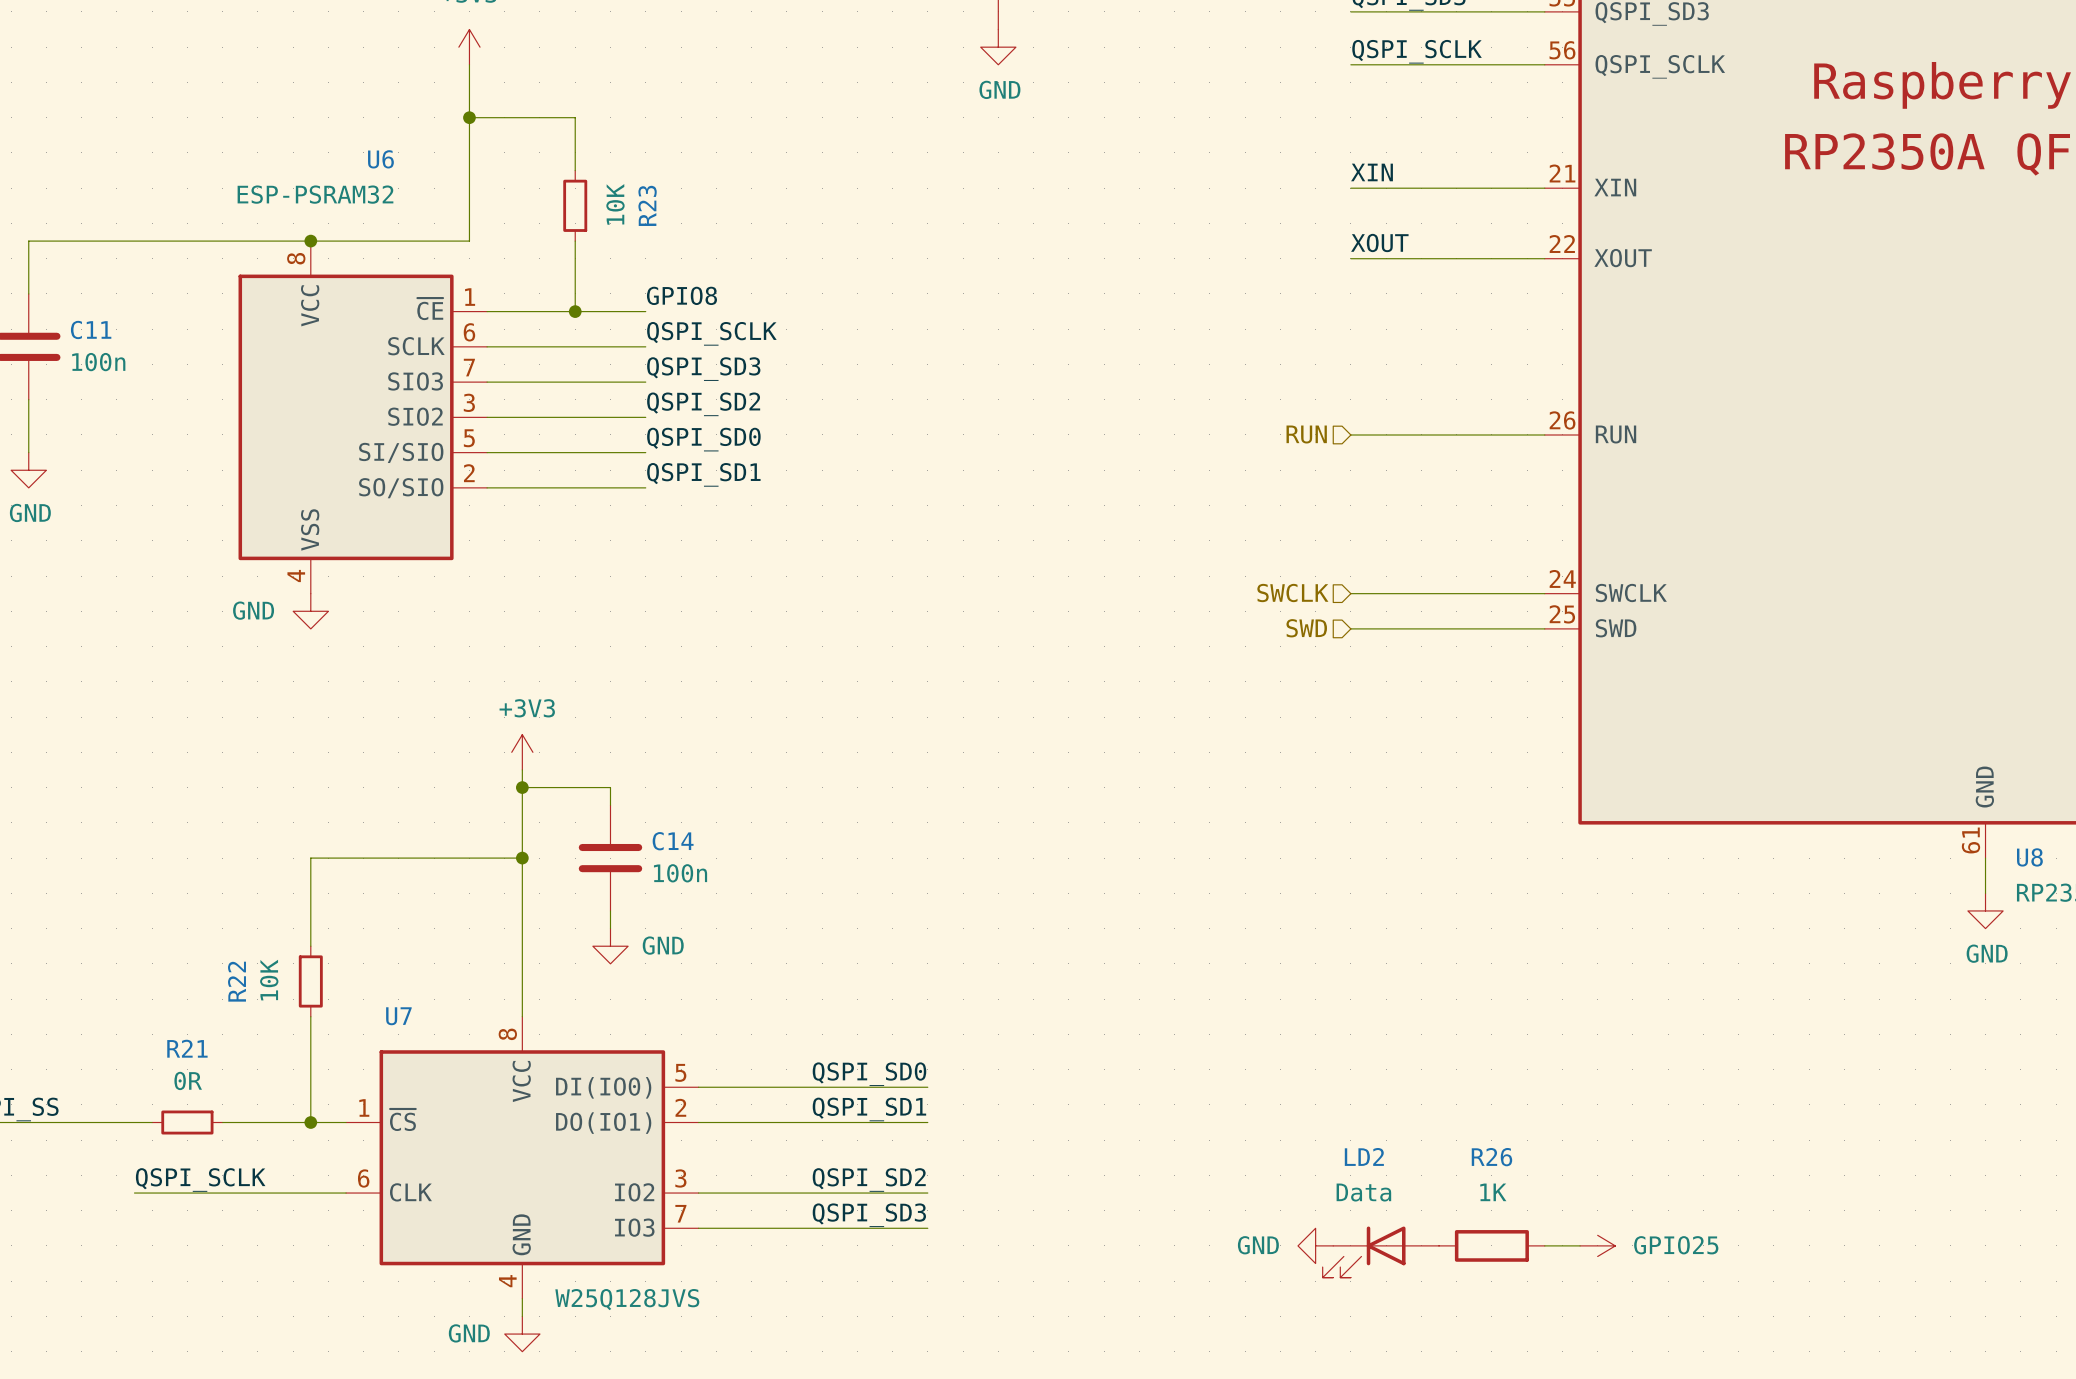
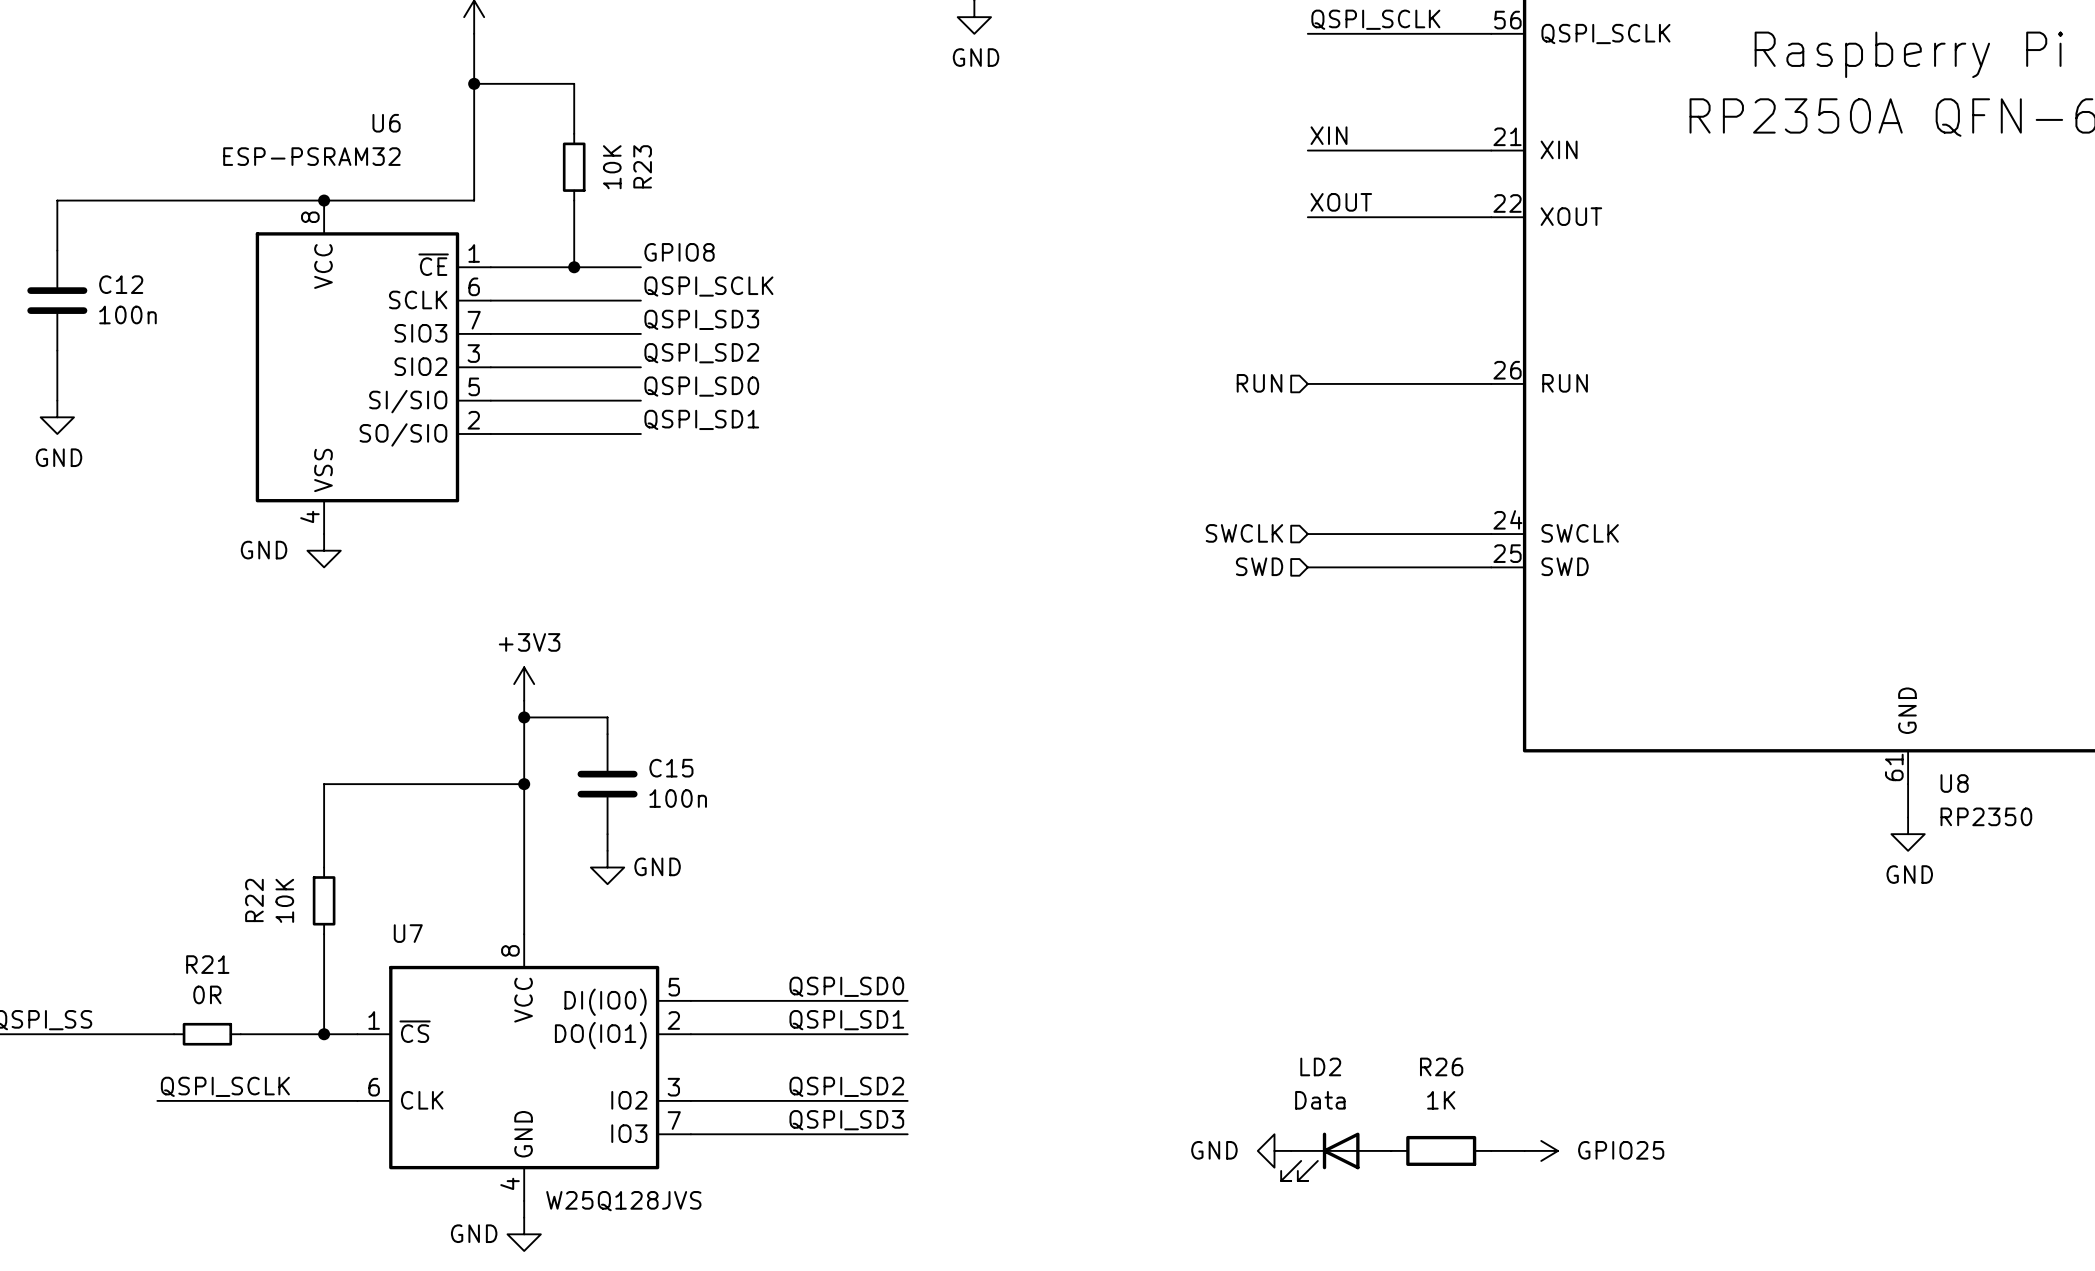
C11 name: C11 (91, 329) -> C12 (121, 284)
C14 name: C14 (673, 841) -> C15 (671, 768)

